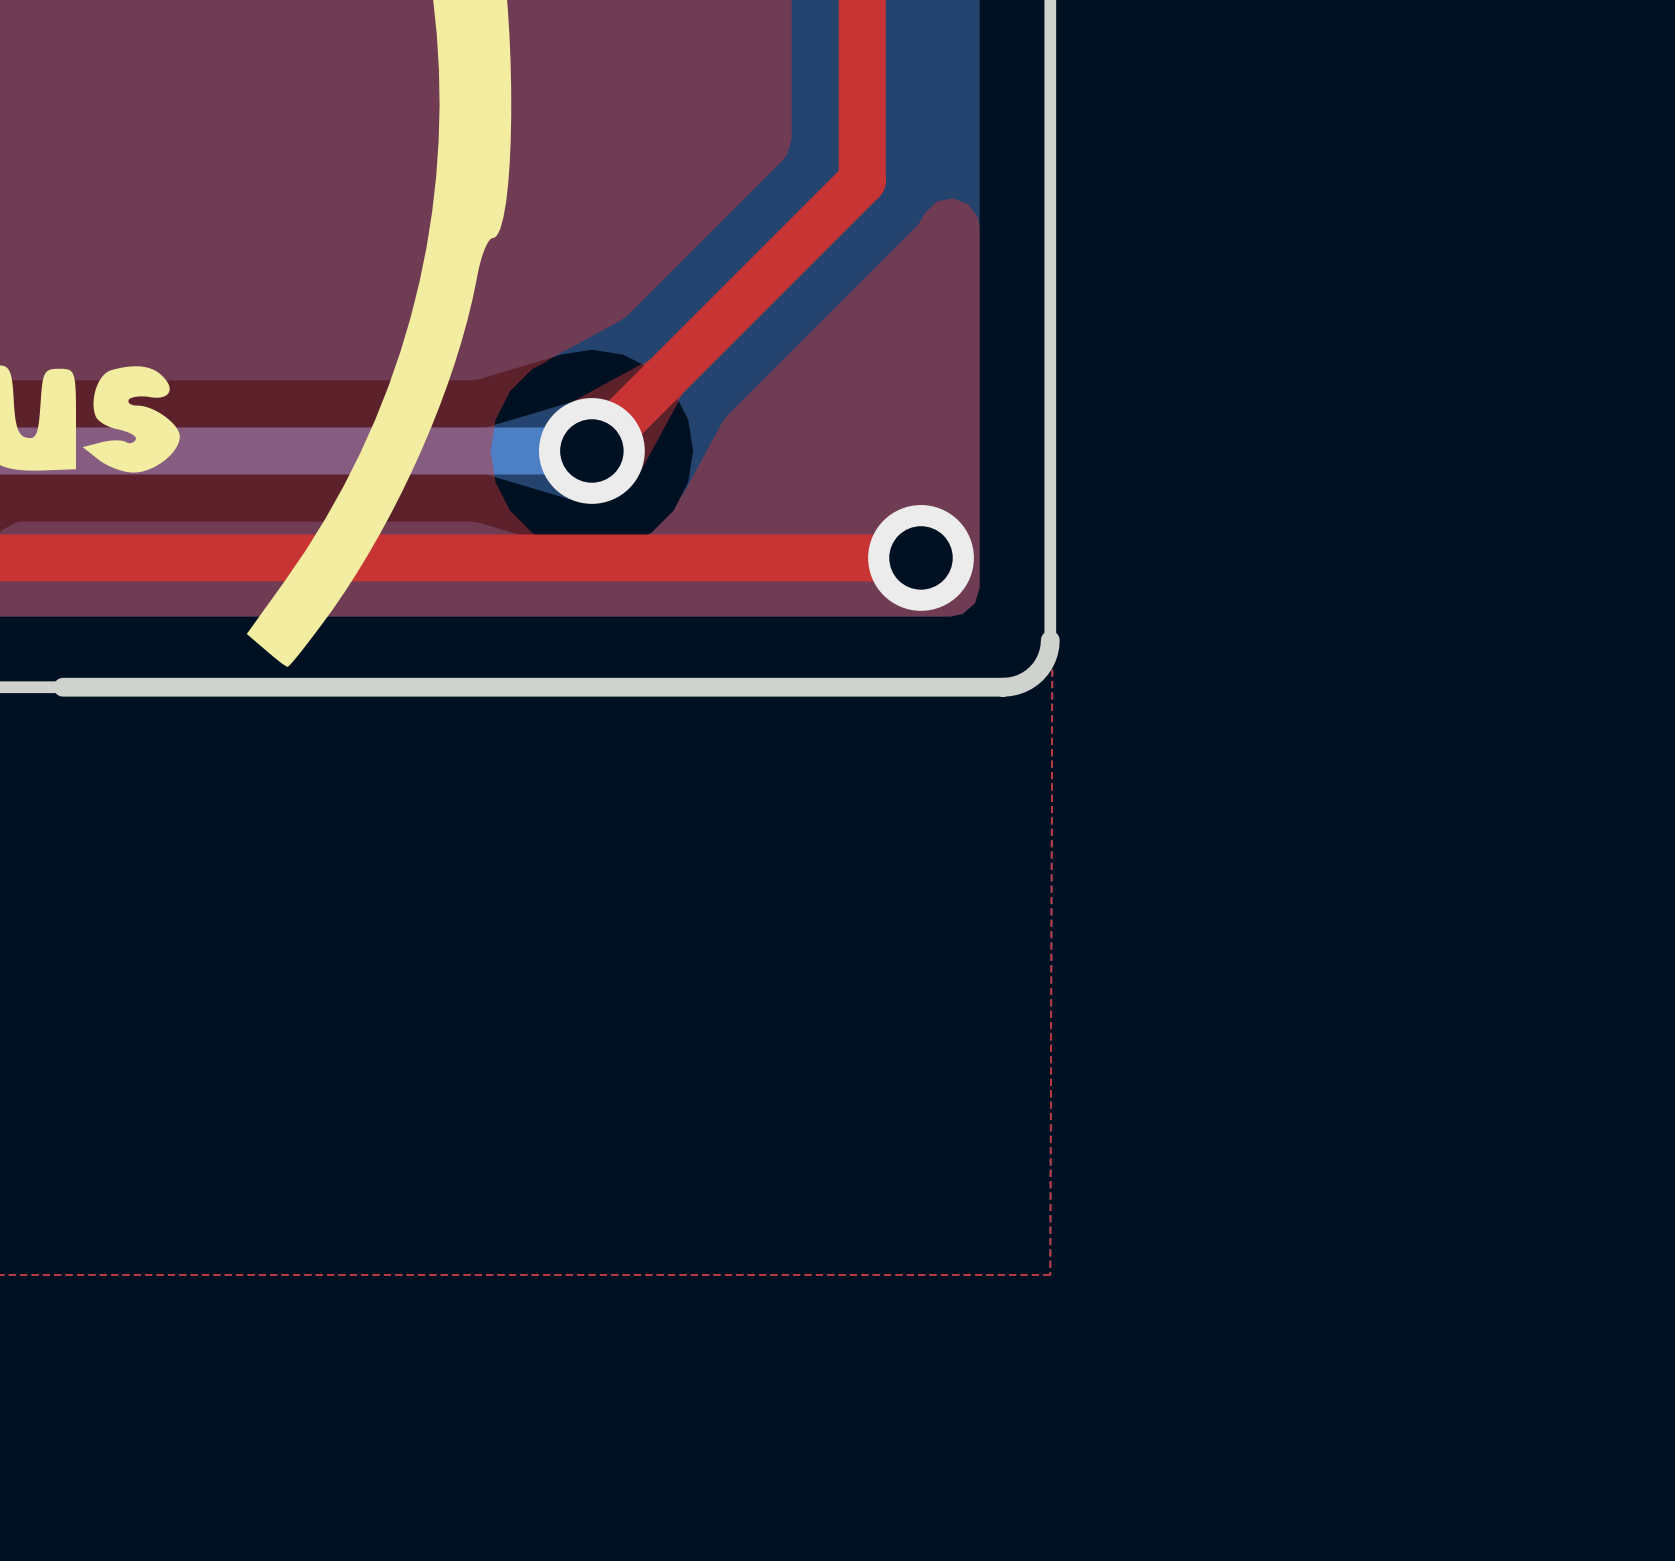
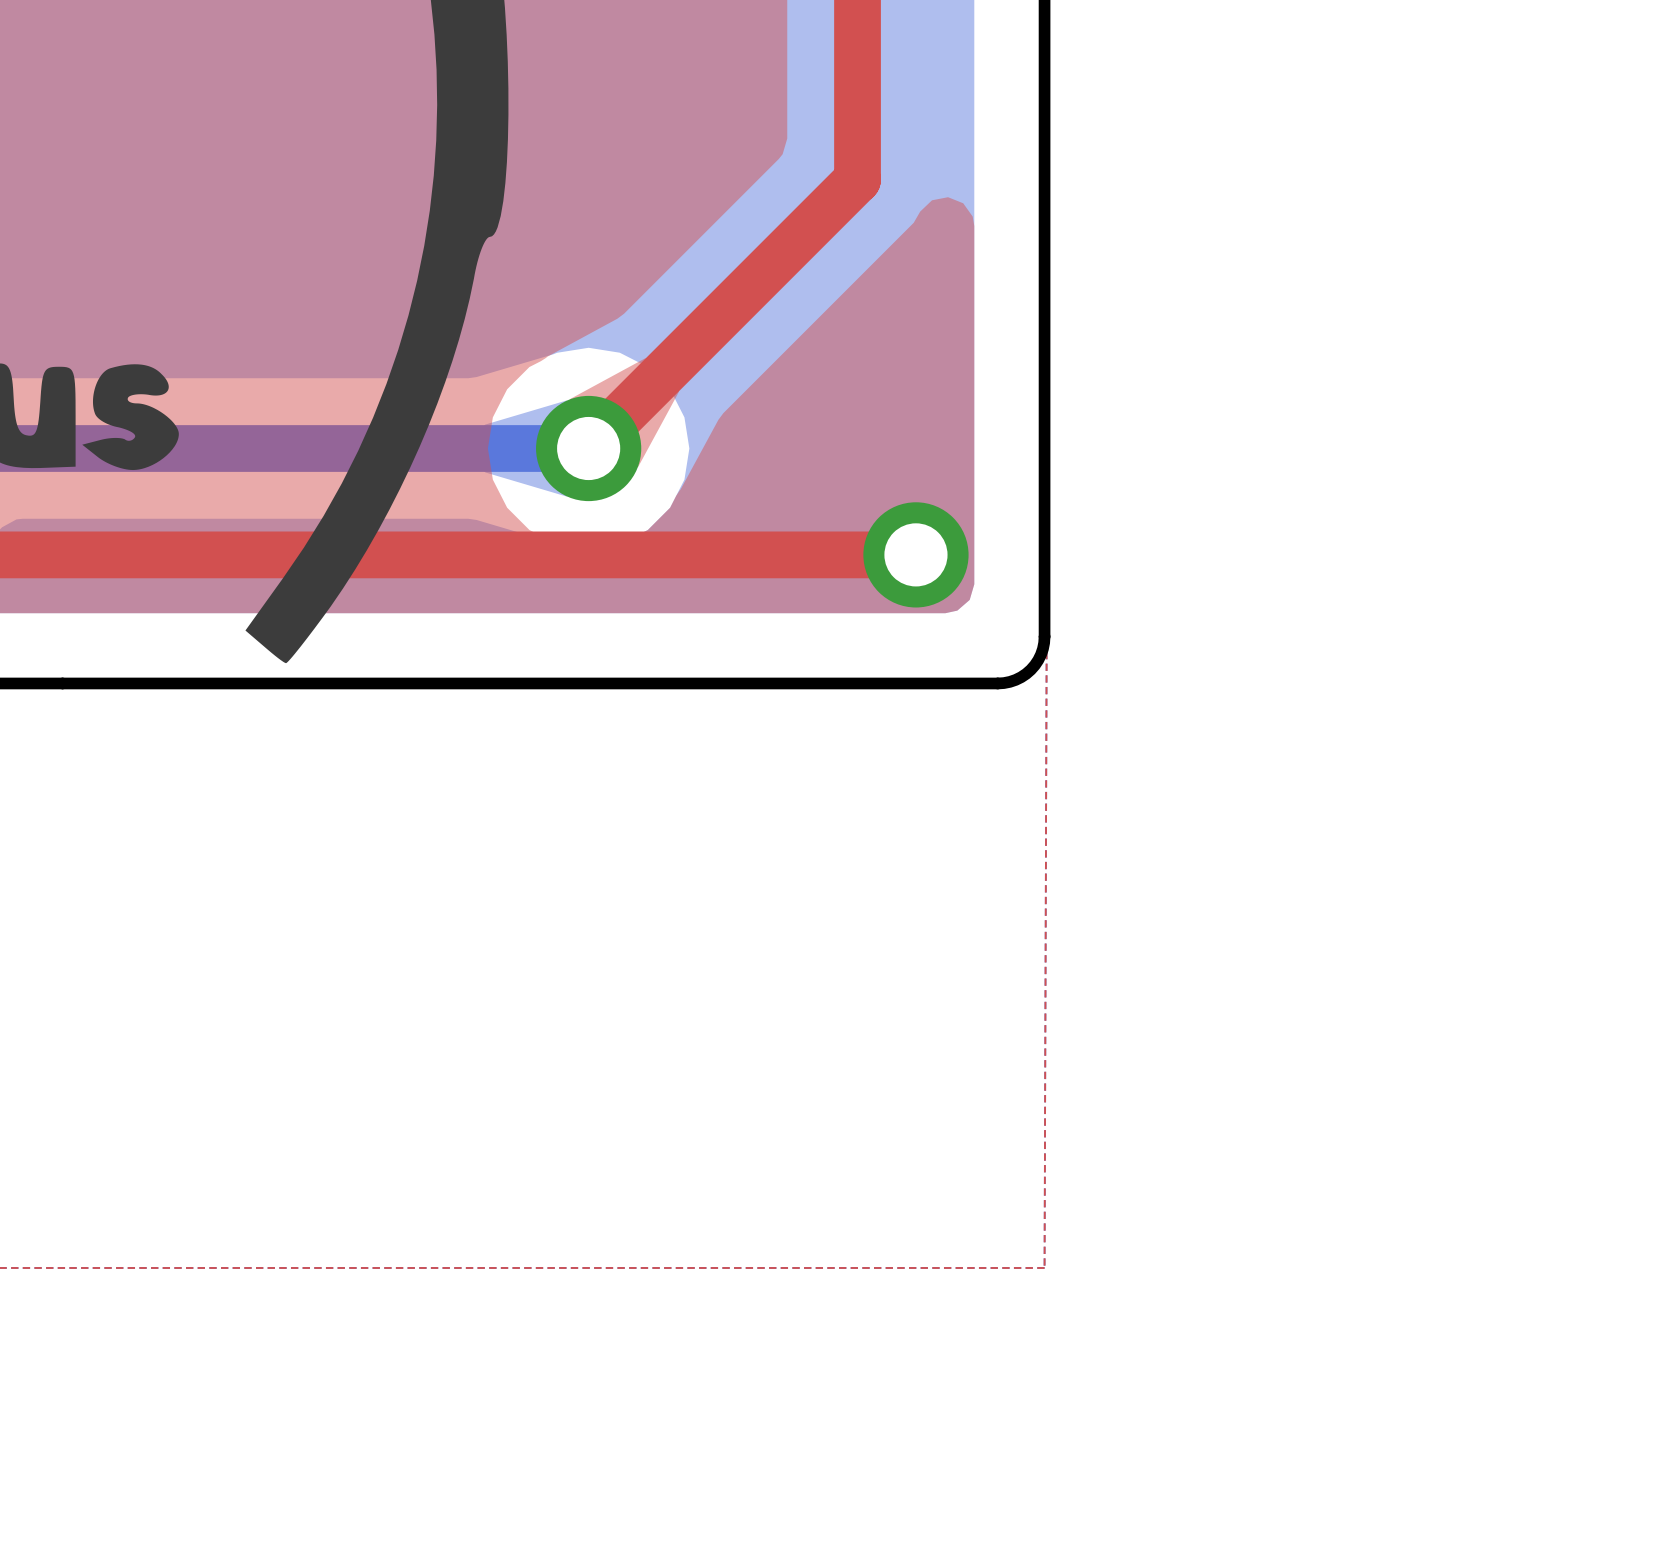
board edge width: thick (1050, 640) (1046, 658) (1036, 673) (1021, 683) (1003, 687) (62, 687) -> thin (1044, 636) (1041, 654) (1030, 669) (1015, 679) (997, 683) (62, 683)

